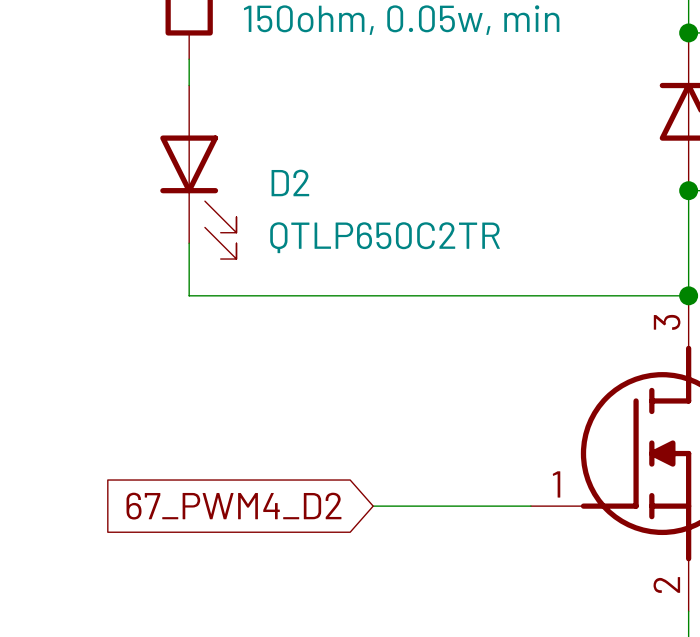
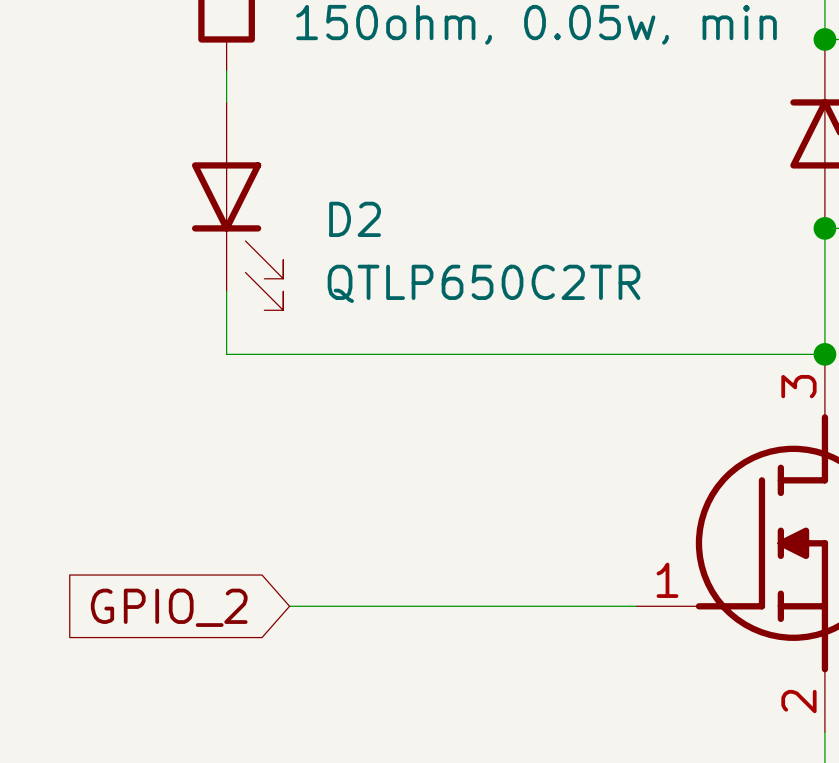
global label: none -> GPIO_2 (169, 607)
global label: 67_PWM4_D2 (233, 506) -> none
wire: none -> (289, 606) (447, 606)

